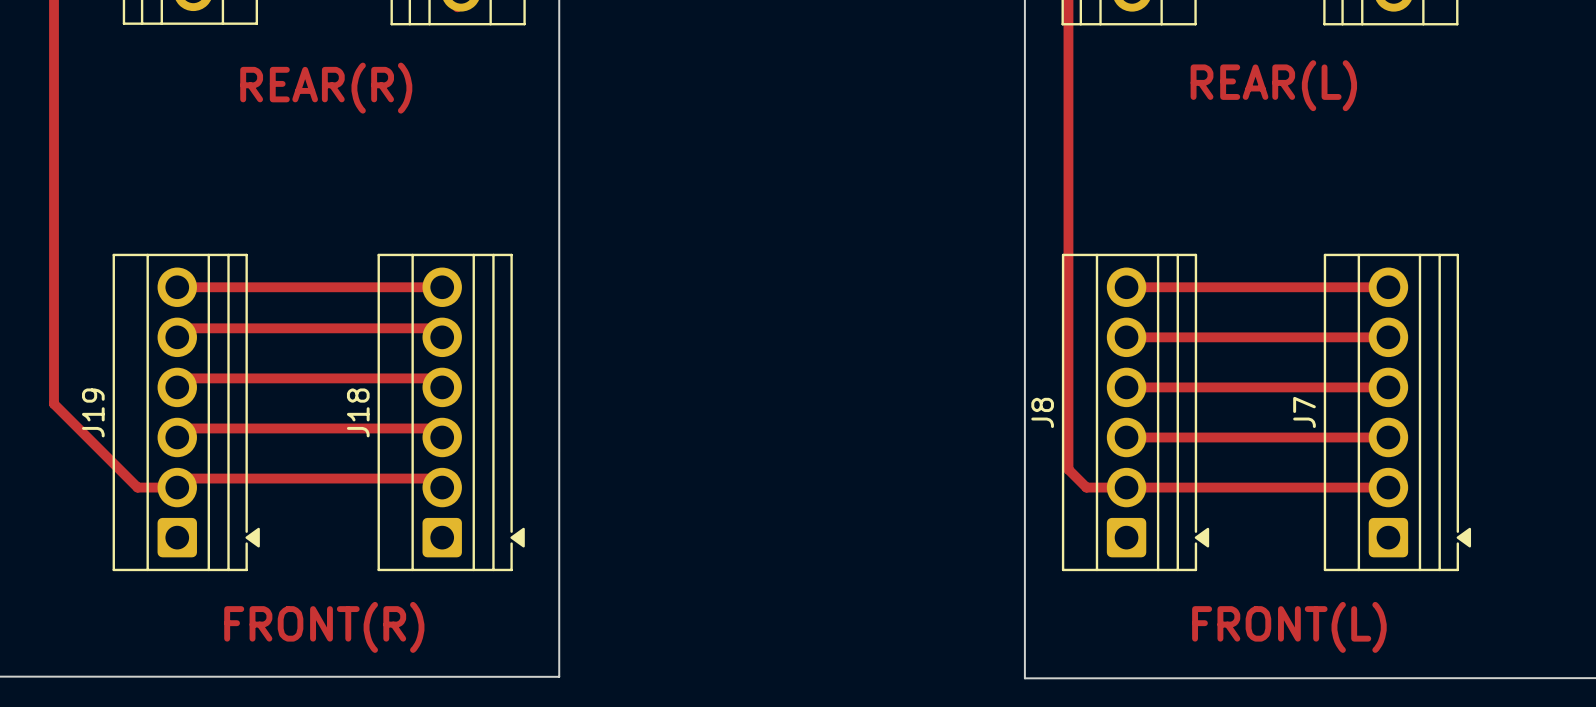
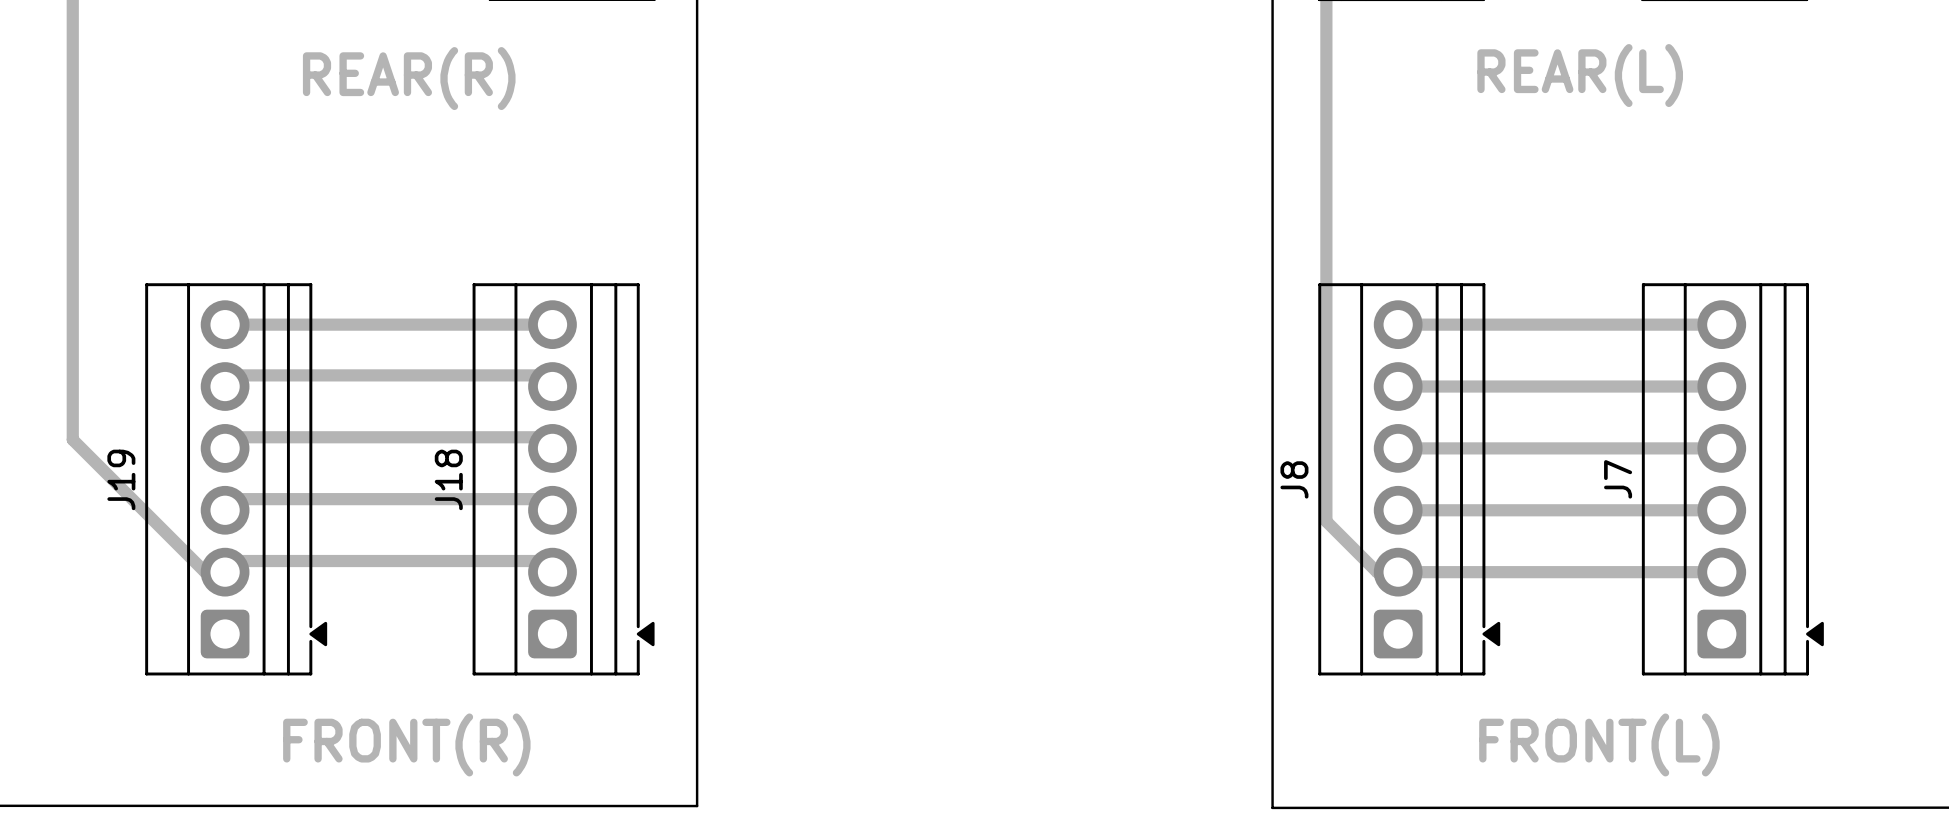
track: (53, 380) (53, 403) (137, 487) (161, 487) -> (72, 439) (205, 572)
track: (1068, 446) (1068, 469) (1086, 487) (1109, 487) -> (1326, 521) (1377, 572)

